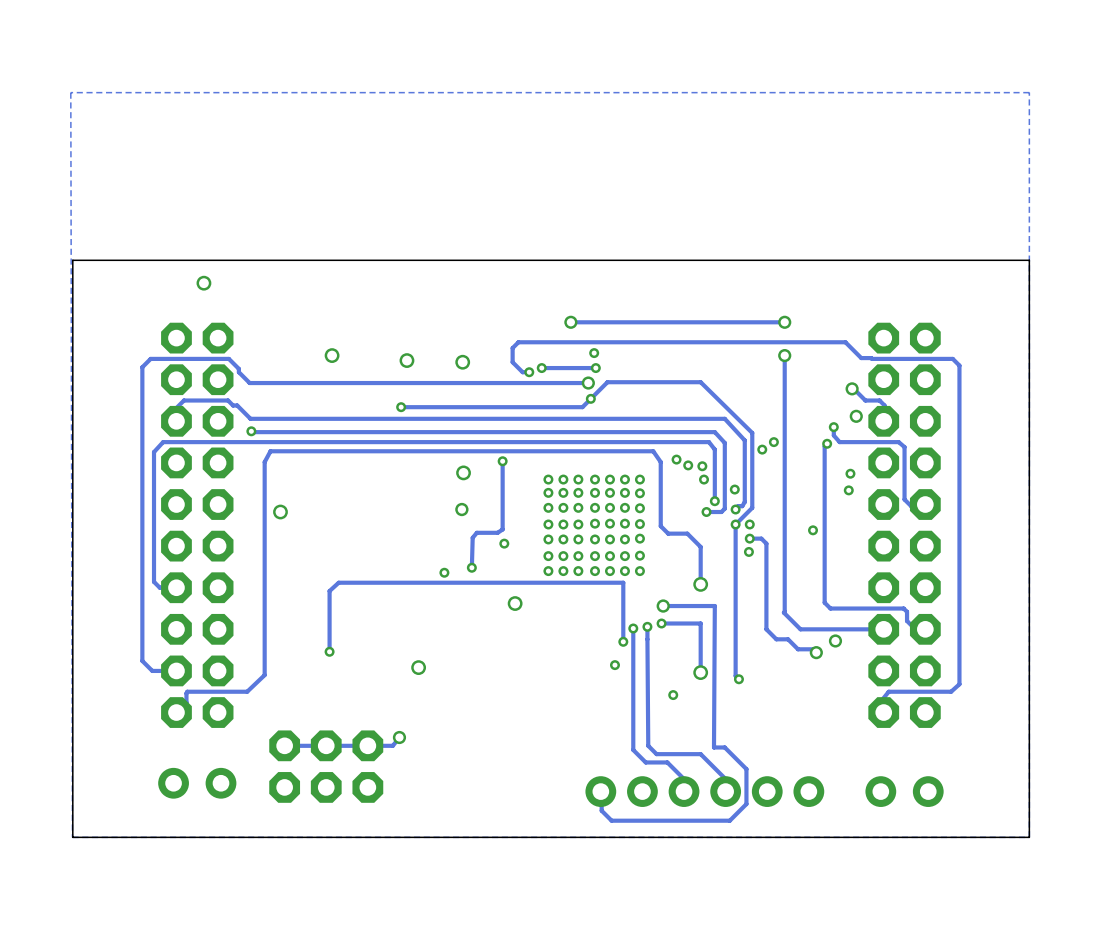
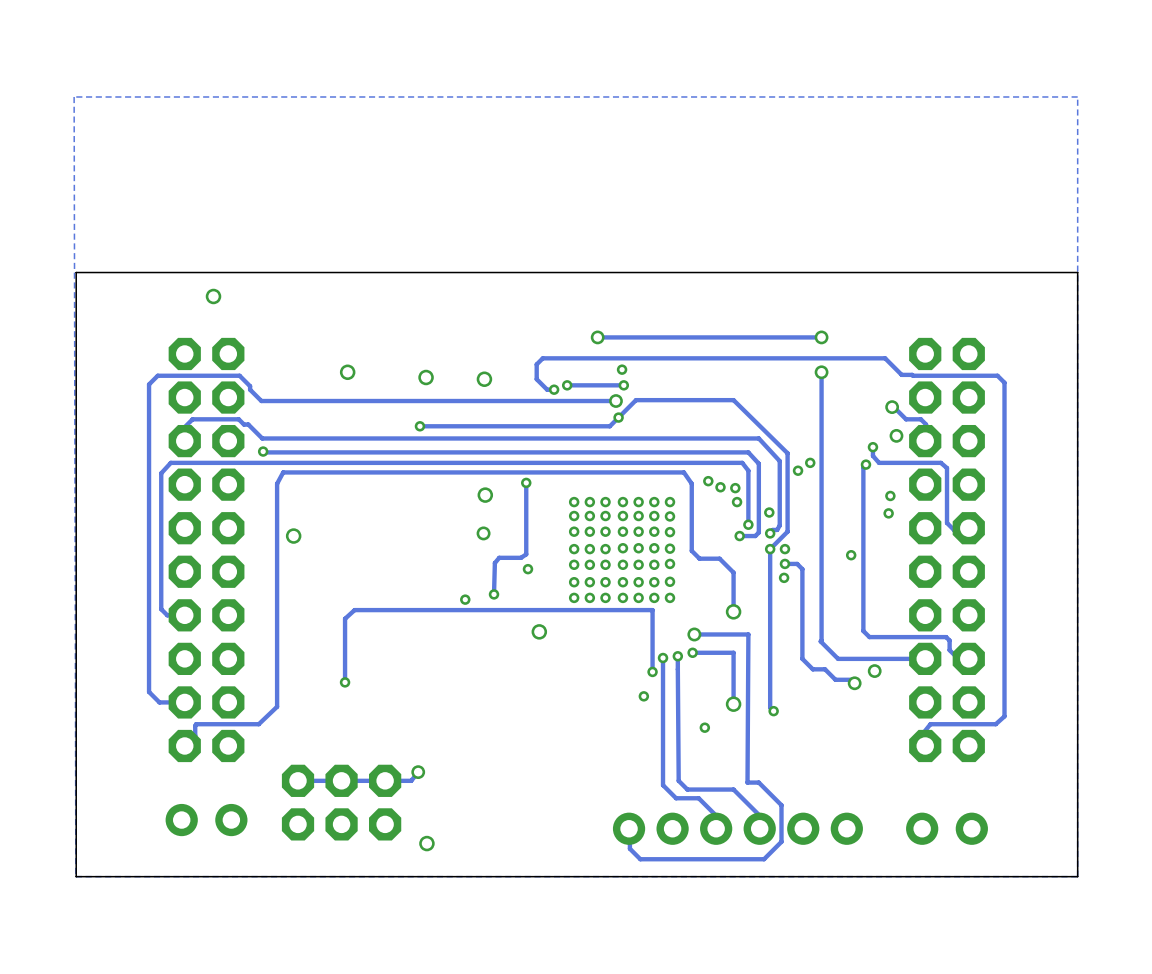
via: (418, 667) -> none
via: none -> (426, 843)

